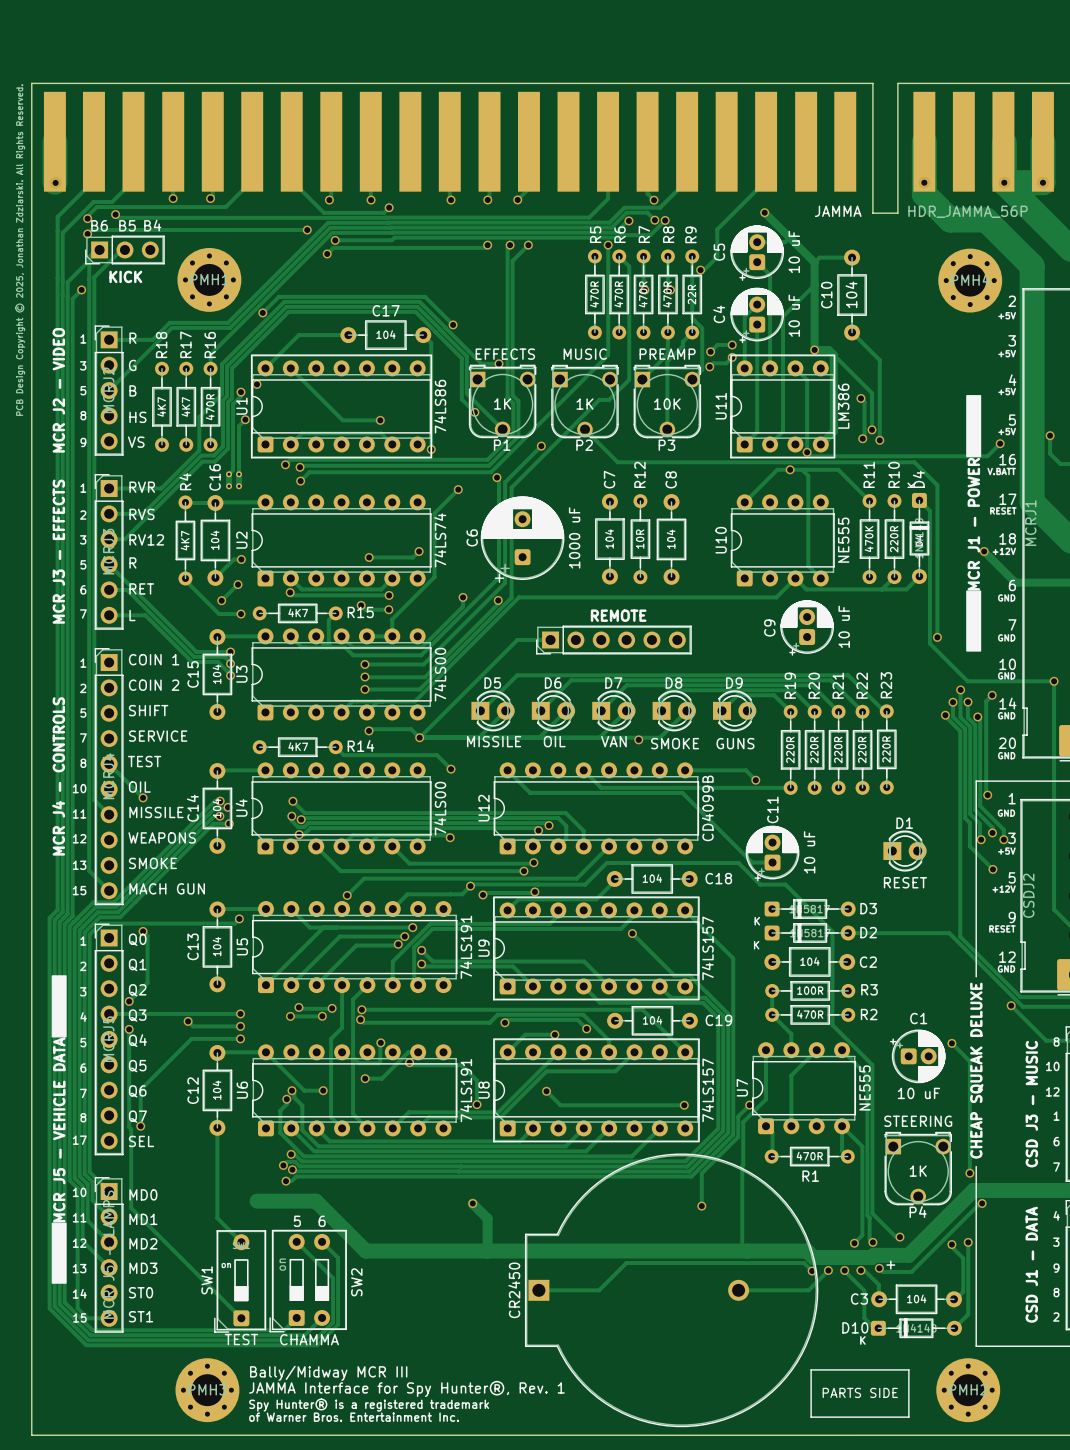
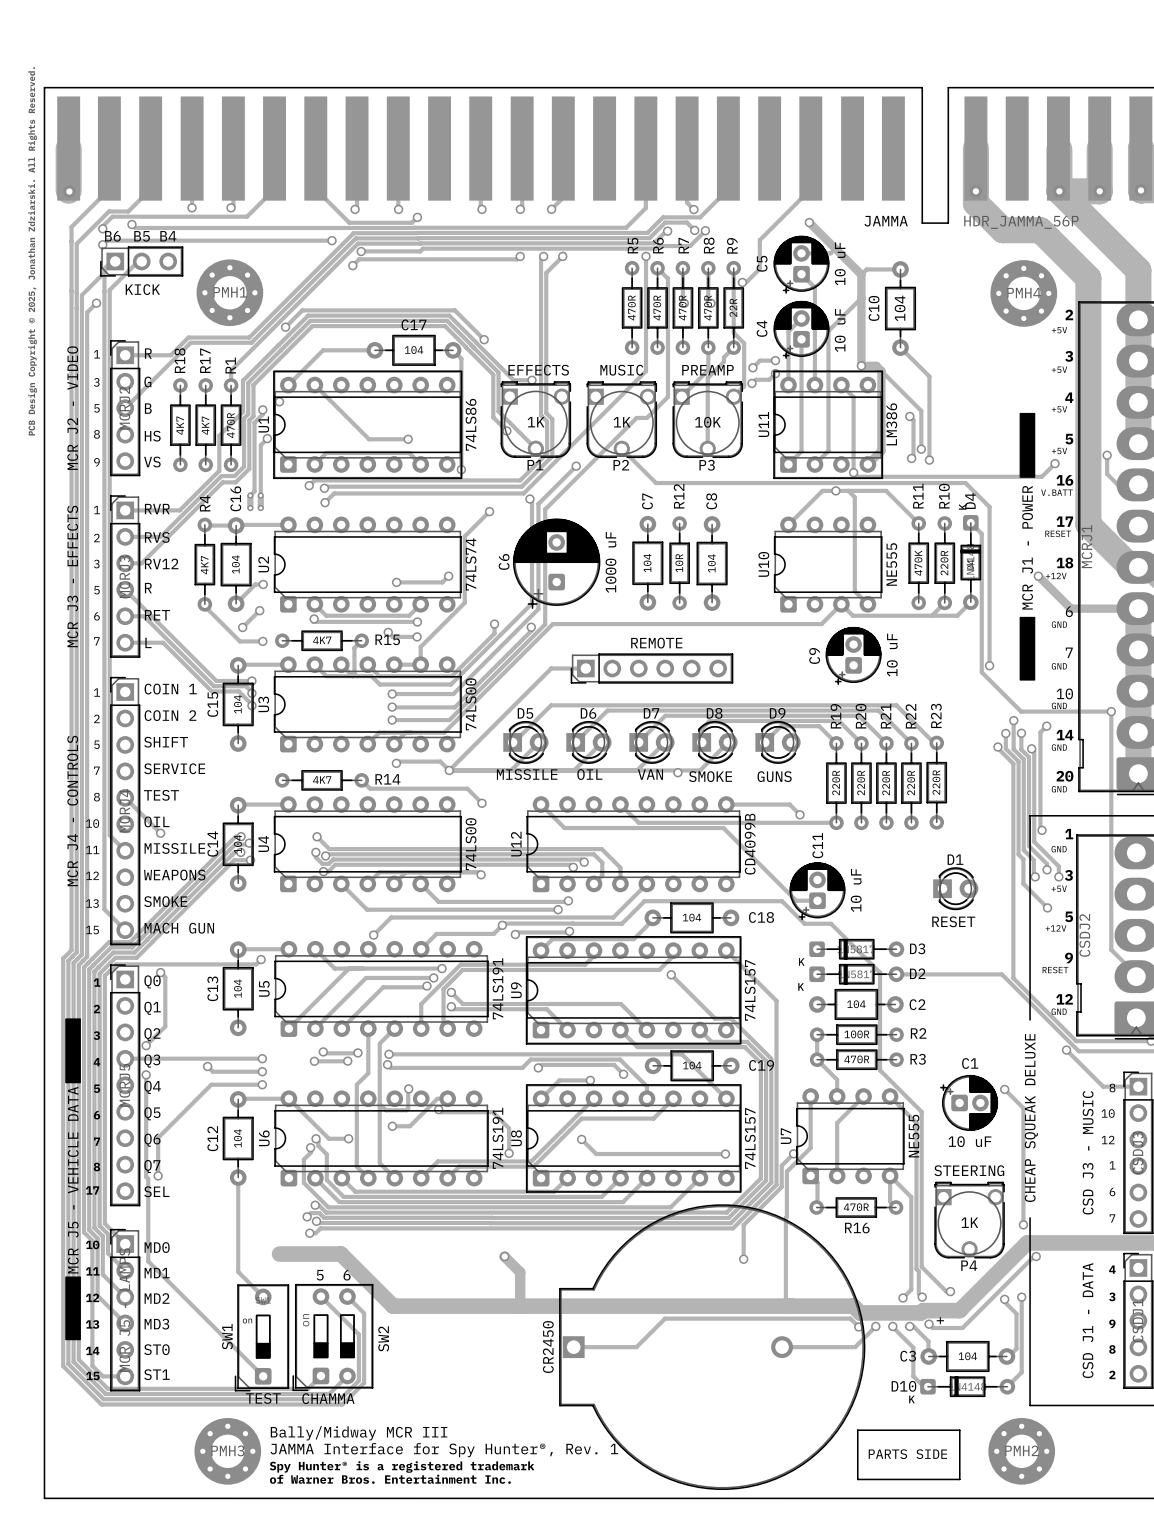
R16 name: R16 (210, 345) -> R1 (230, 365)
R3 name: R3 (869, 989) -> R2 (918, 1033)
R2 name: R2 (869, 1014) -> R3 (918, 1059)
R1 name: R1 (810, 1176) -> R16 (857, 1228)

